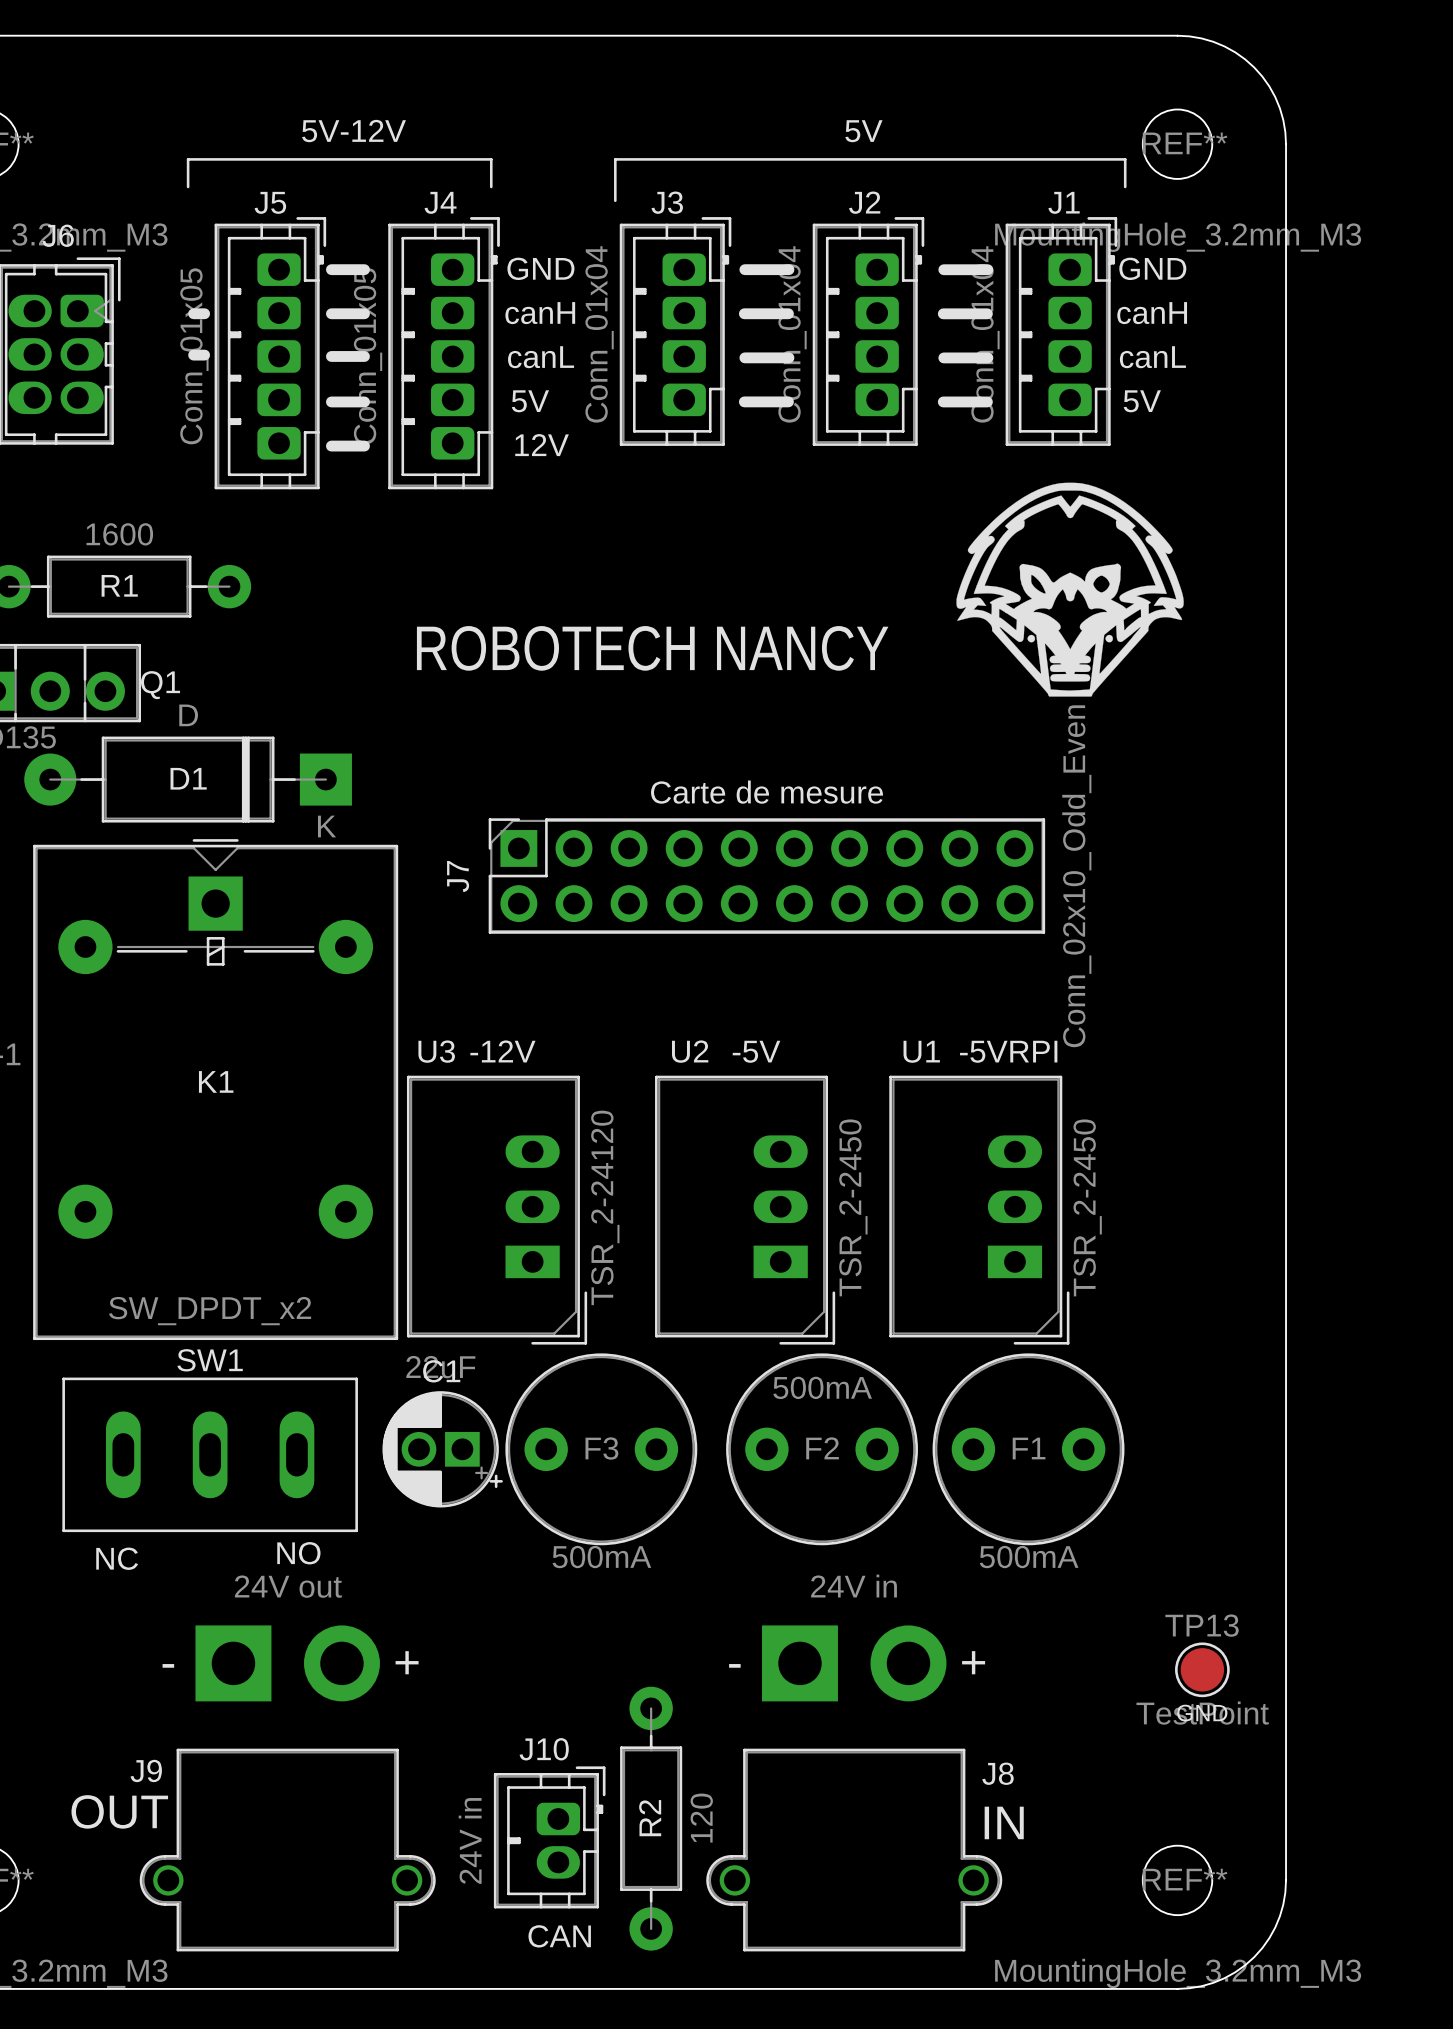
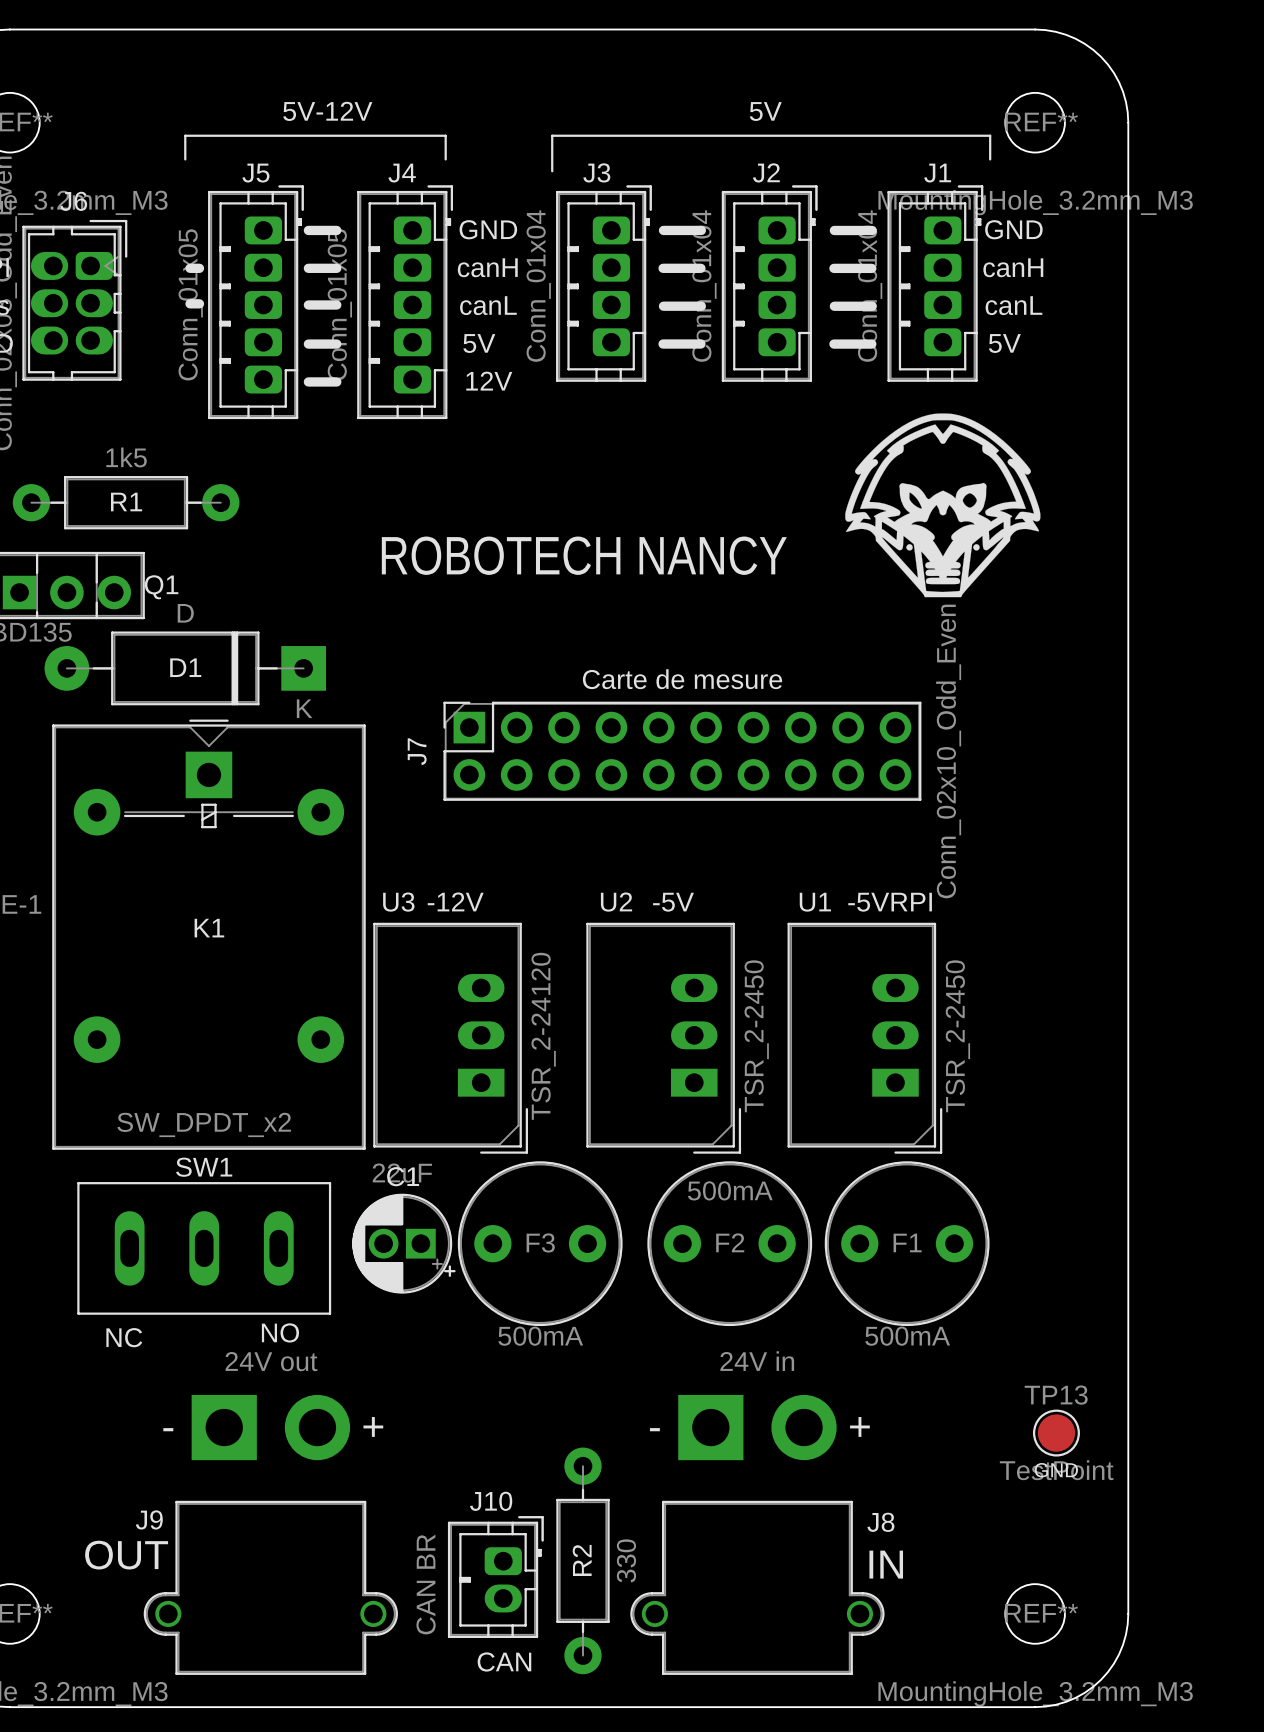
R1 value: 1600 (119, 534) -> 1k5 (126, 457)
R2 value: 120 (701, 1818) -> 330 (626, 1560)
J10 value: 24V in (470, 1840) -> CAN BR (426, 1584)

